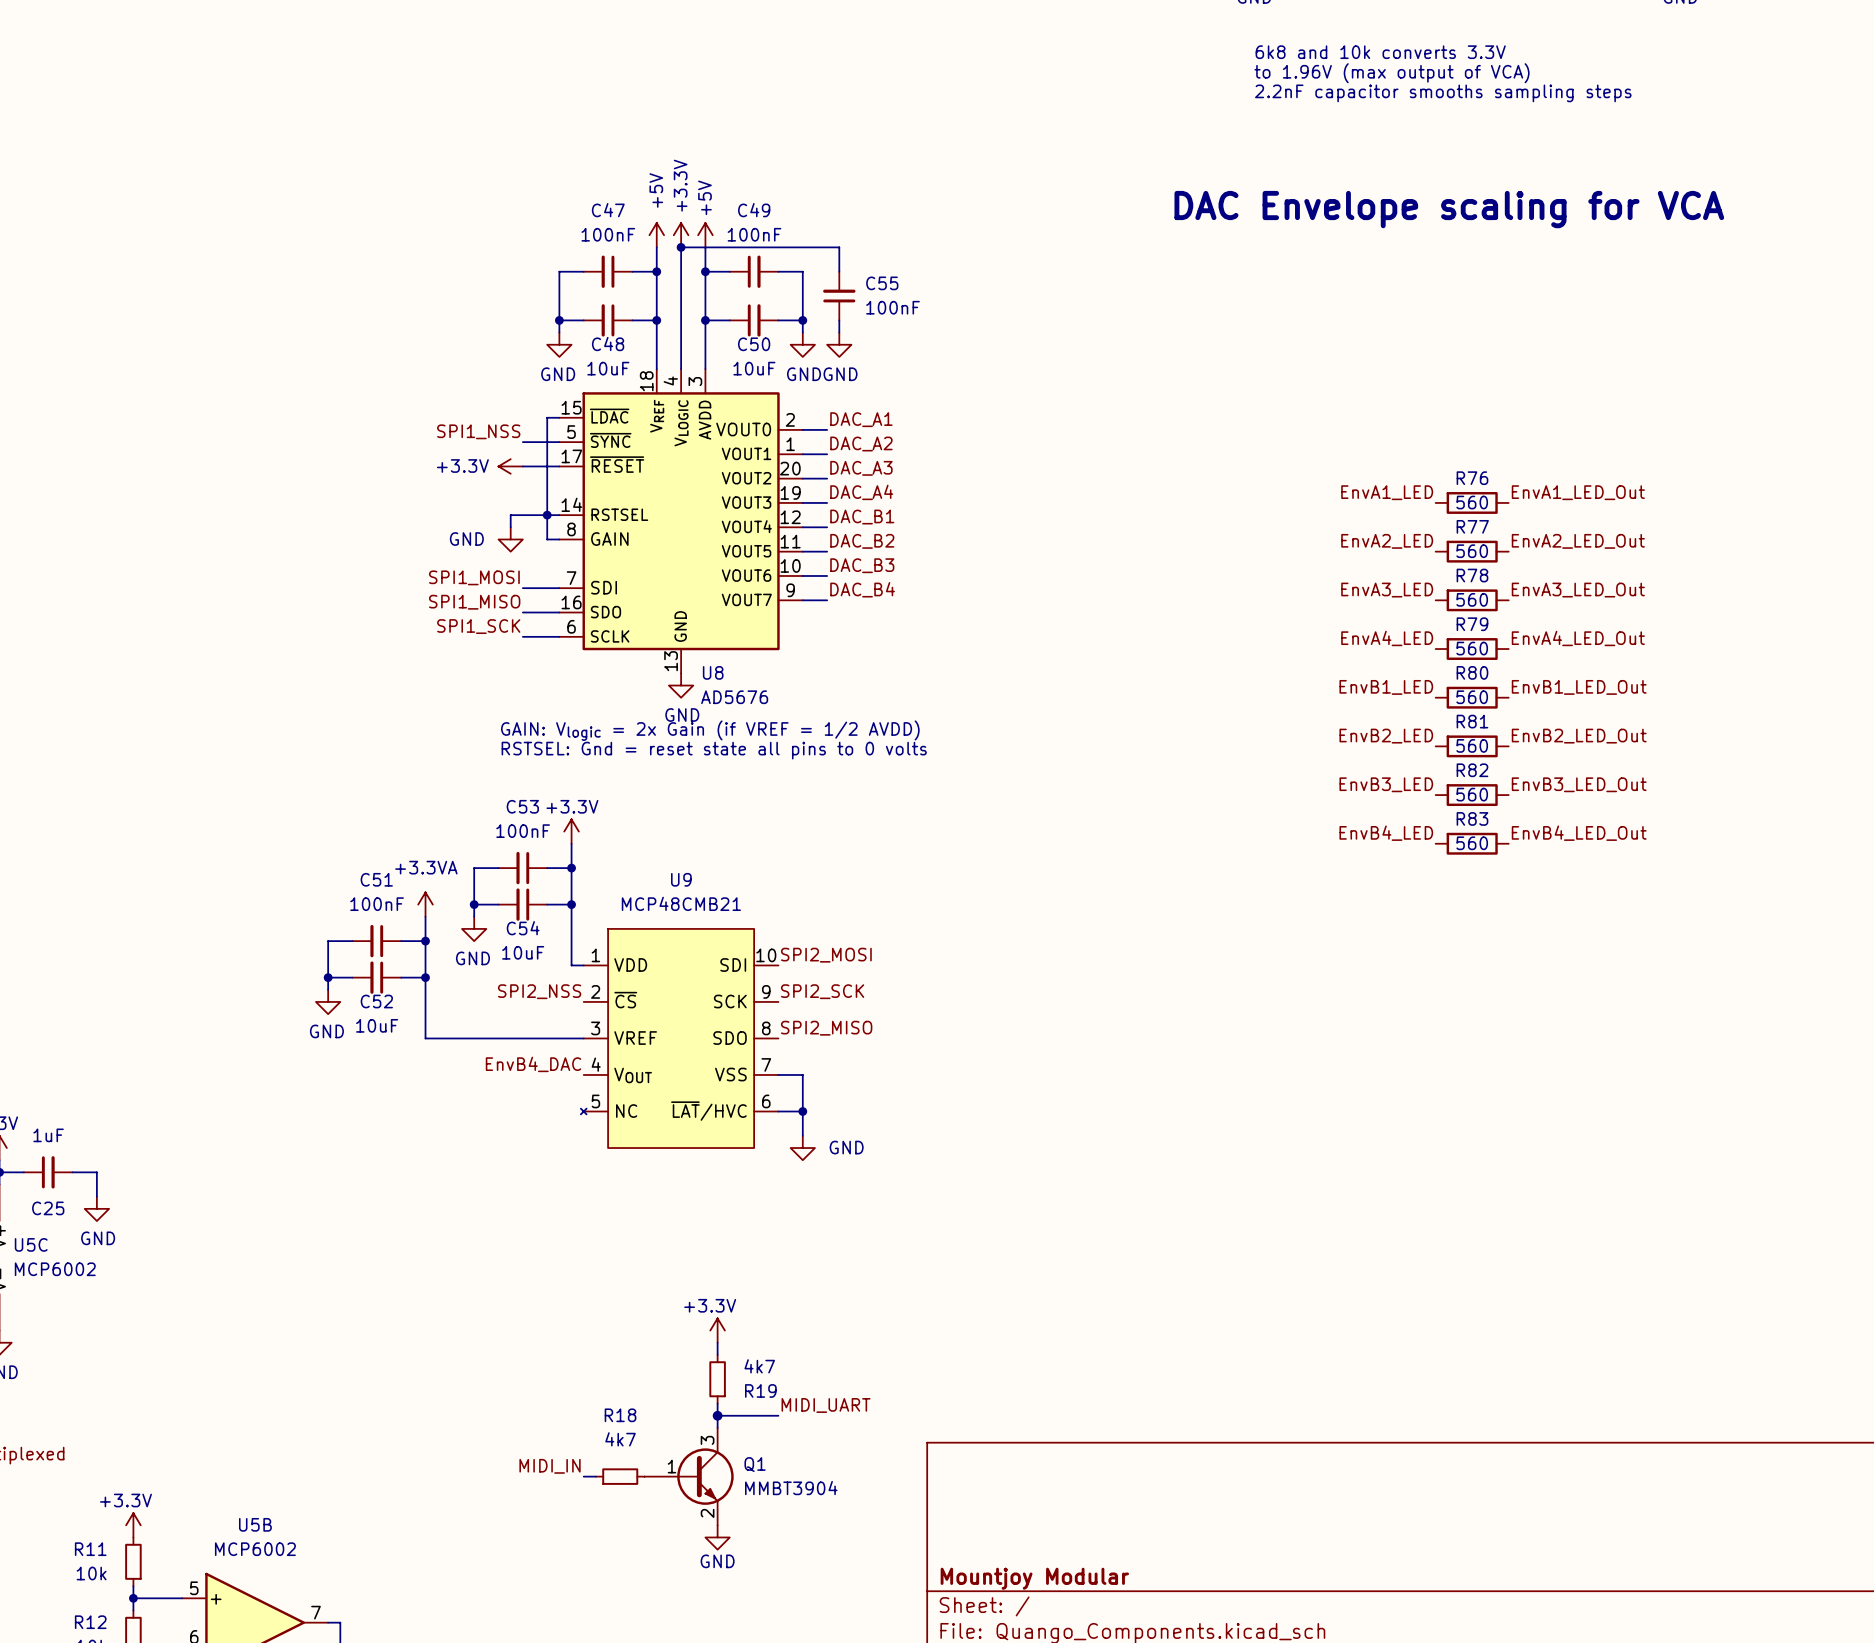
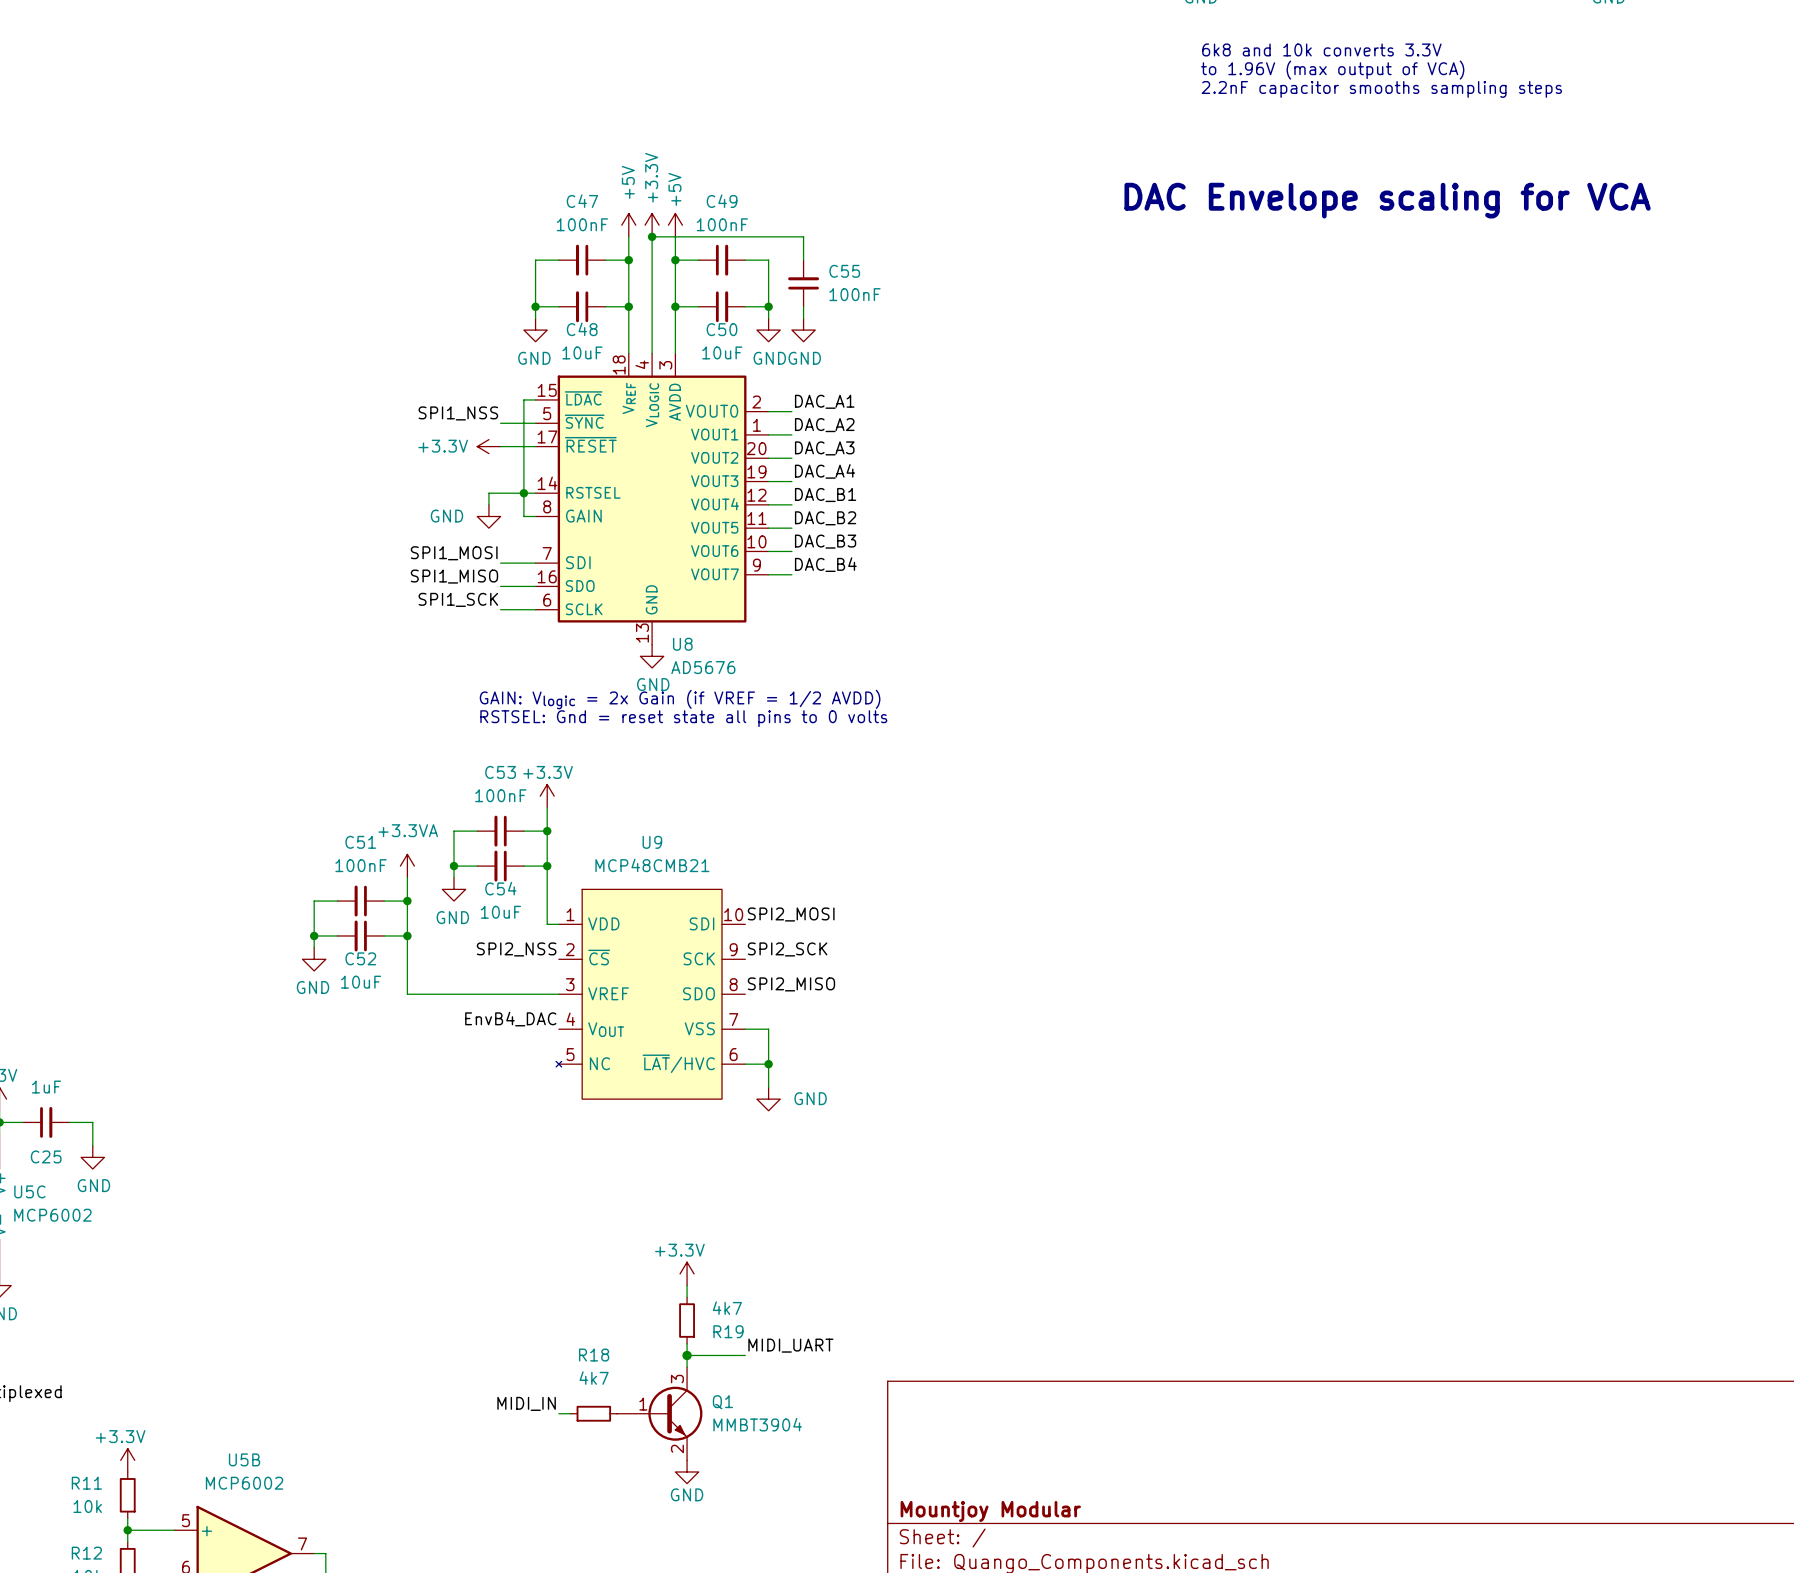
label: EnvA1_LED (1387, 492) -> none
label: EnvA1_LED_Out (1578, 492) -> none
R76: 560 (1472, 502) -> none
label: EnvA2_LED (1387, 541) -> none
label: EnvA2_LED_Out (1578, 541) -> none
R77: 560 (1472, 551) -> none
label: EnvA3_LED (1387, 590) -> none
label: EnvA3_LED_Out (1578, 590) -> none
R78: 560 (1472, 600) -> none
label: EnvA4_LED (1387, 638) -> none
label: EnvA4_LED_Out (1578, 638) -> none
R79: 560 (1472, 649) -> none
label: EnvB1_LED (1386, 687) -> none
label: EnvB1_LED_Out (1579, 687) -> none
R80: 560 (1472, 697) -> none
label: EnvB2_LED (1386, 736) -> none
label: EnvB2_LED_Out (1579, 736) -> none
R81: 560 (1472, 746) -> none
label: EnvB3_LED (1386, 784) -> none
label: EnvB3_LED_Out (1579, 784) -> none
R82: 560 (1472, 795) -> none
label: EnvB4_LED (1386, 833) -> none
label: EnvB4_LED_Out (1579, 833) -> none
R83: 560 (1472, 843) -> none

